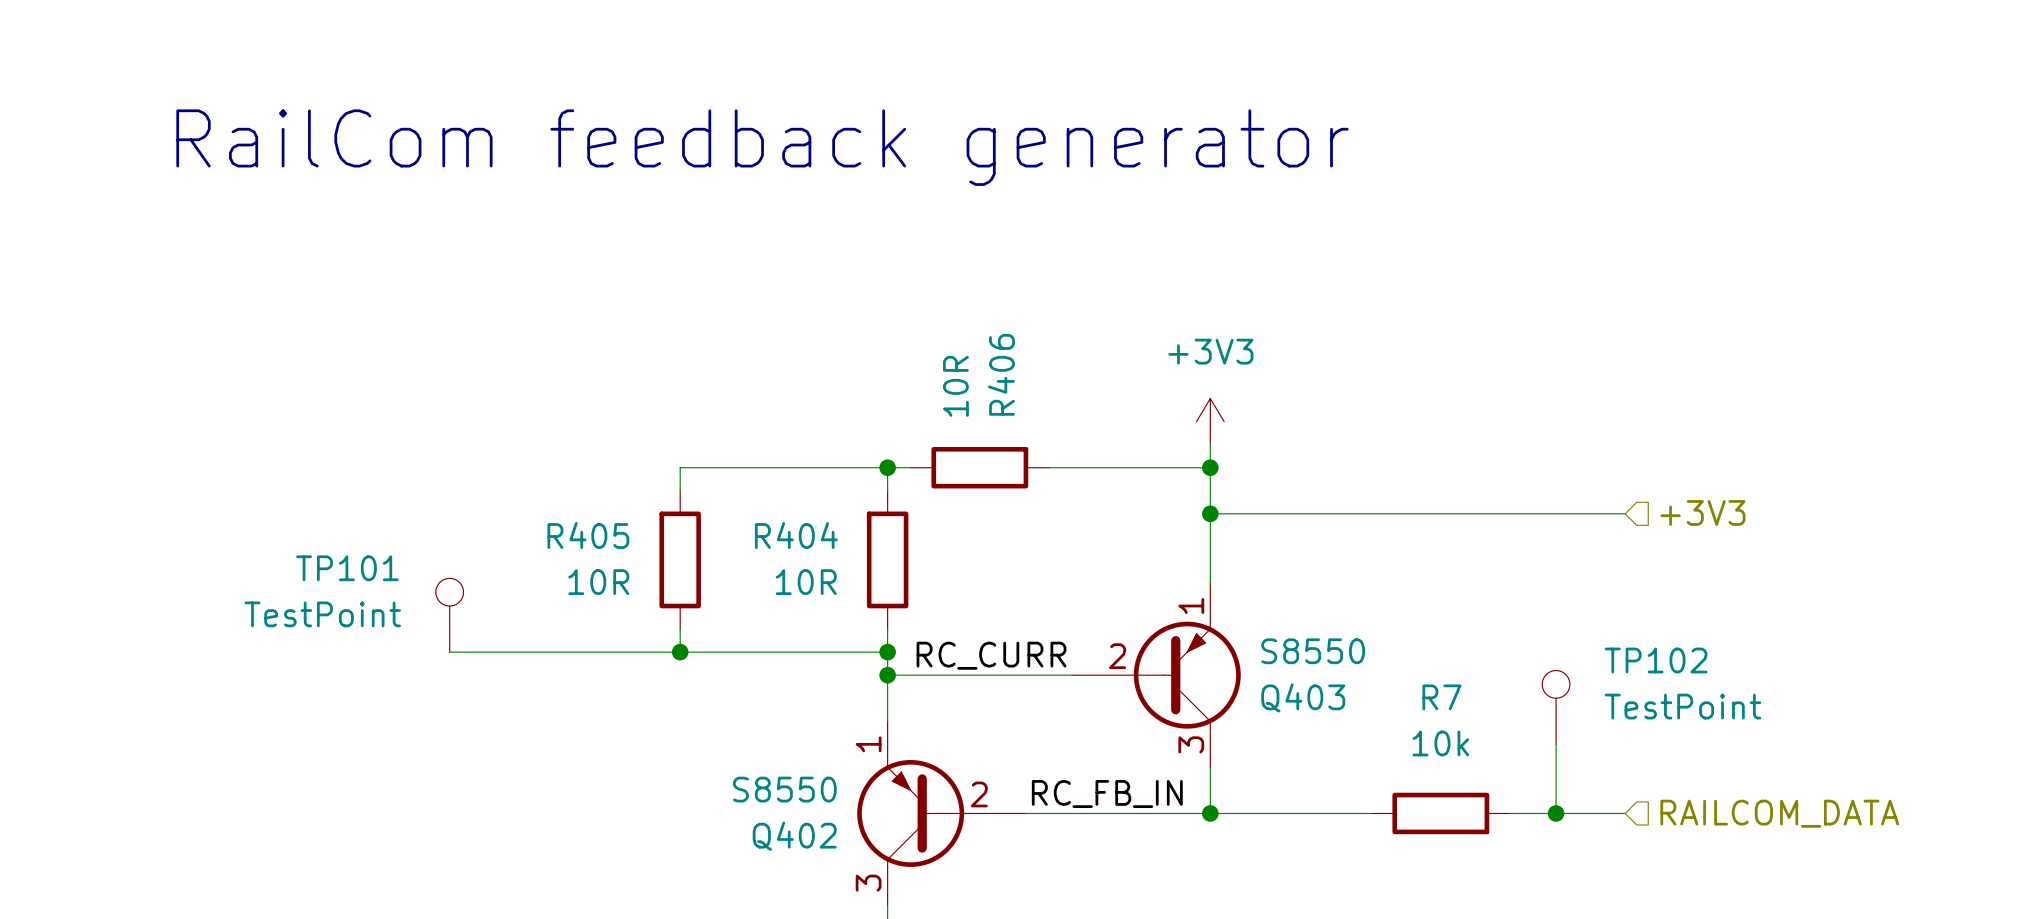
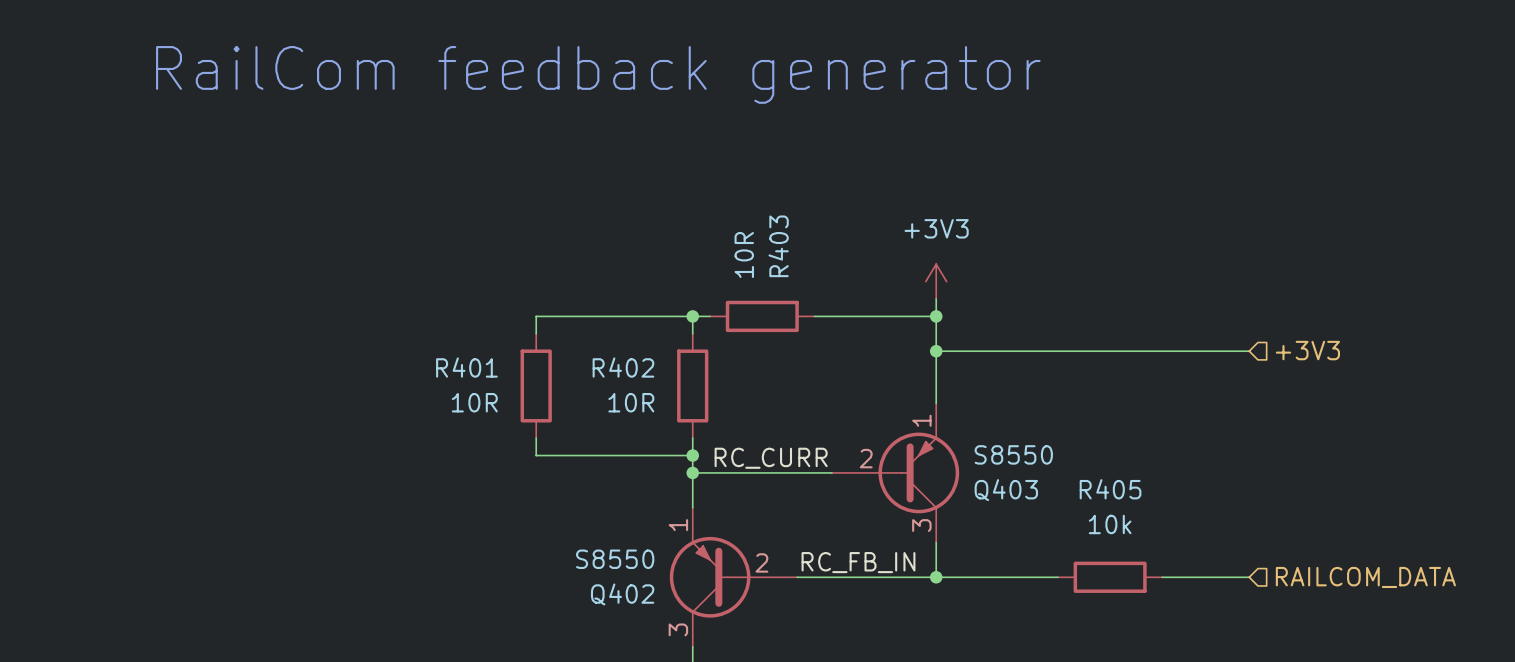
R406 name: R406 (1001, 374) -> R403 (778, 246)
R405 name: R405 (588, 535) -> R401 (466, 367)
R404 name: R404 (796, 535) -> R402 (623, 367)
TP101: TestPoint (449, 615) -> none
wire: (449, 652) (680, 652) -> none
junction: (680, 652) -> none
R7 name: R7 (1441, 697) -> R405 (1110, 489)
TP102: TestPoint (1556, 707) -> none
wire: (1556, 744) (1556, 813) -> none
junction: (1556, 813) -> none

